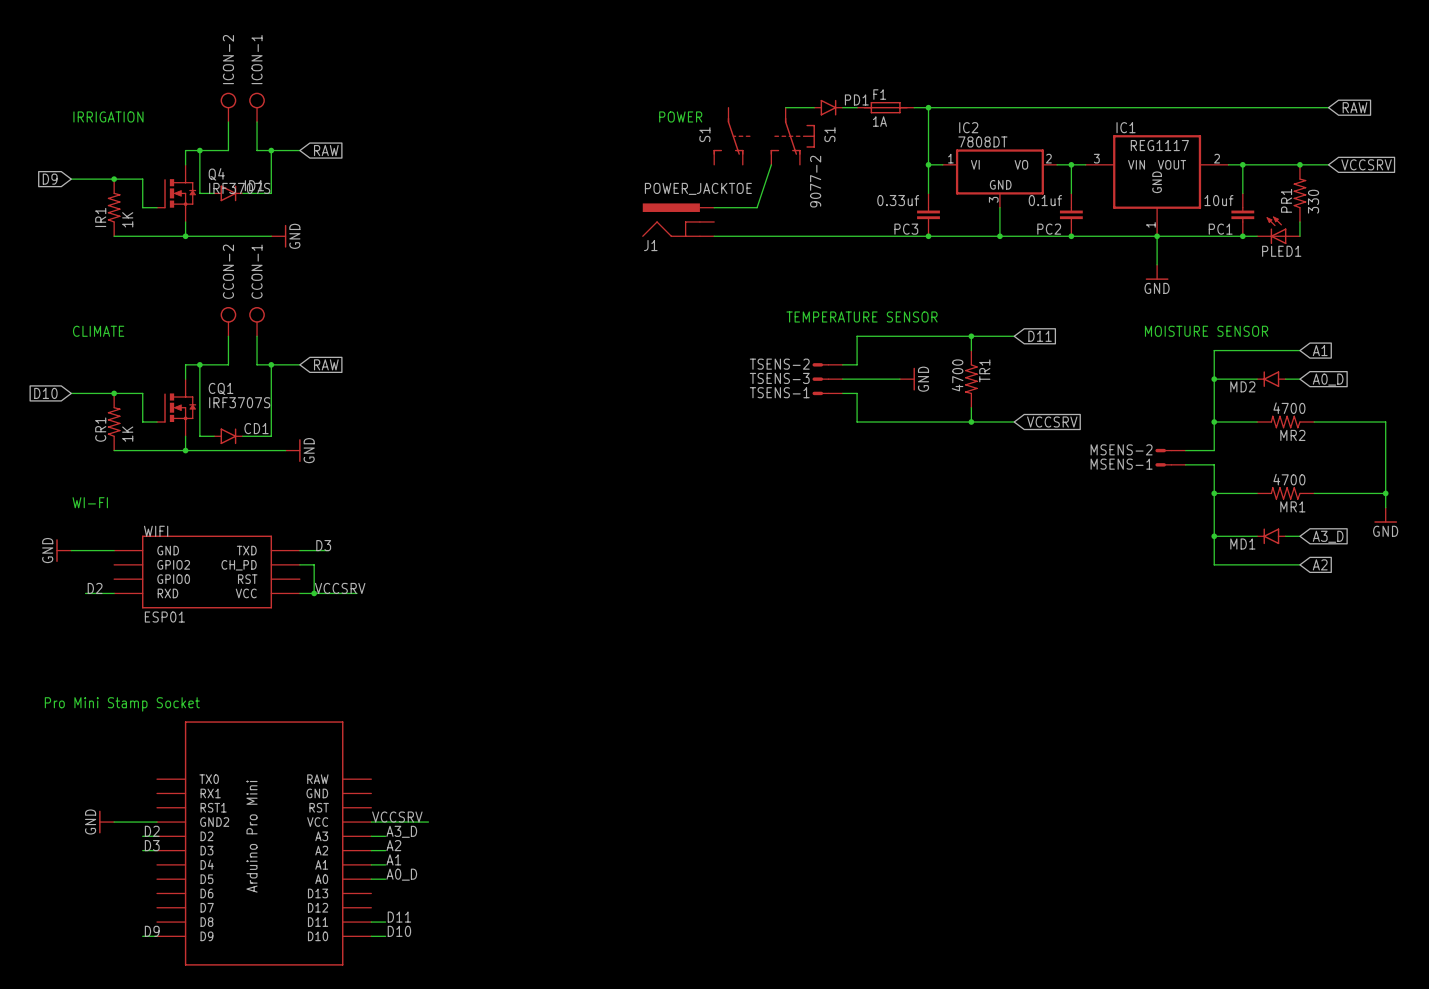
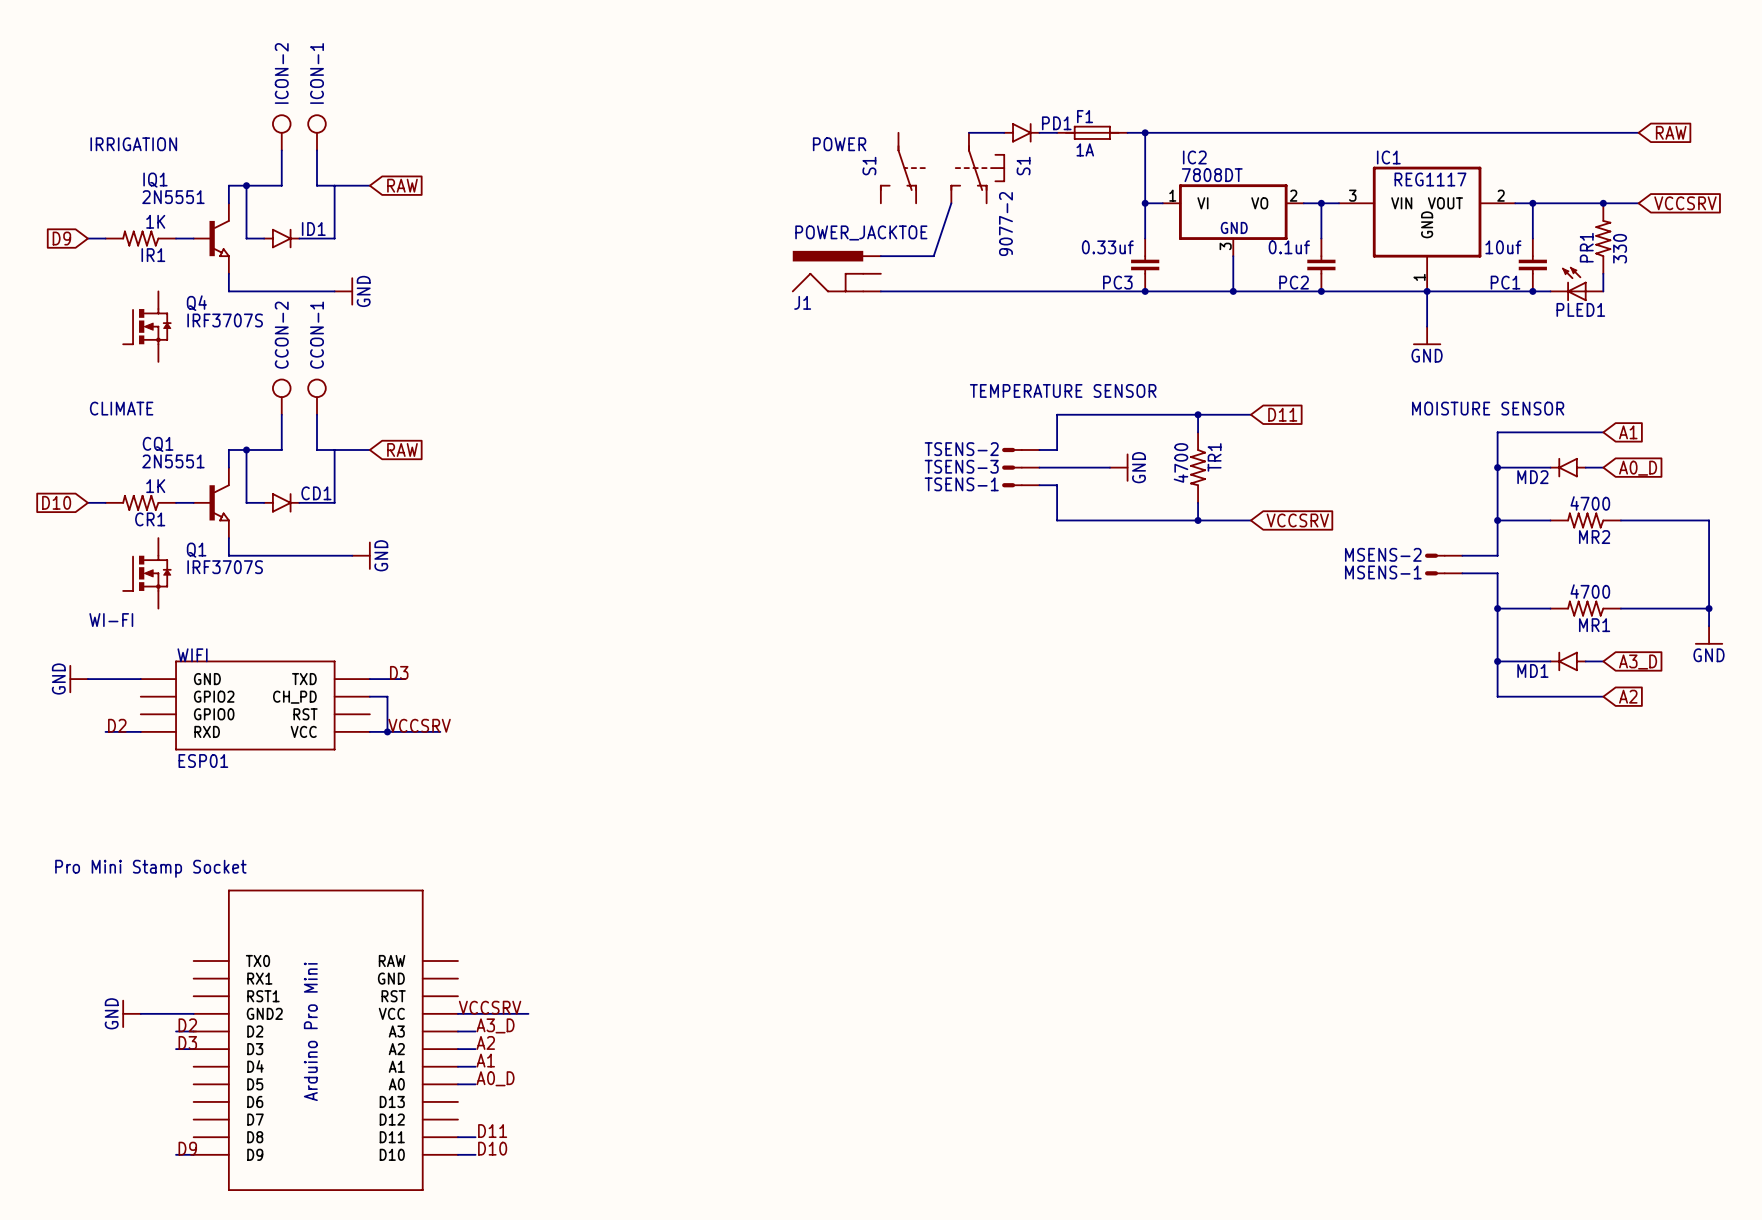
junction: (271, 150) -> none
global label position: D9 (50, 179) -> D9 (61, 238)
wire: (71, 179) (142, 179) (142, 207) (157, 207) -> none
junction: (114, 179) -> none
wire: none -> (87, 238) (105, 238)
wire: none -> (176, 238) (193, 238)
IQ1: none -> 2N5551 (211, 238)
Q4 position: (176, 193) -> (146, 326)
IR1 rotation: 0° (114, 207) -> 90° counterclockwise (140, 238)
wire: (114, 236) (185, 236) -> none
junction: (185, 236) -> none
junction: (271, 364) -> none
CQ1 symbol: [156, 379, 197, 437] -> [193, 467, 230, 539]
CQ1 name position: CQ1 (221, 388) -> CQ1 (158, 444)
global label position: D10 (45, 393) -> D10 (56, 502)
wire: (71, 393) (142, 393) (142, 422) (157, 422) -> none
junction: (114, 393) -> none
CQ1 value: IRF3707S (239, 402) -> 2N5551 (173, 461)
wire: none -> (87, 502) (105, 502)
wire: none -> (176, 502) (193, 502)
wire: (199, 407) (199, 436) (214, 436) -> (246, 502) (264, 502)
wire: (271, 407) (271, 436) (242, 436) -> (334, 502) (299, 502)
CR1 rotation: 0° (114, 422) -> 90° counterclockwise (140, 502)
CD1 position: (228, 436) -> (281, 502)
wire: (114, 450) (185, 450) -> none
junction: (185, 450) -> none
Q1: none -> IRF3707S (146, 573)

